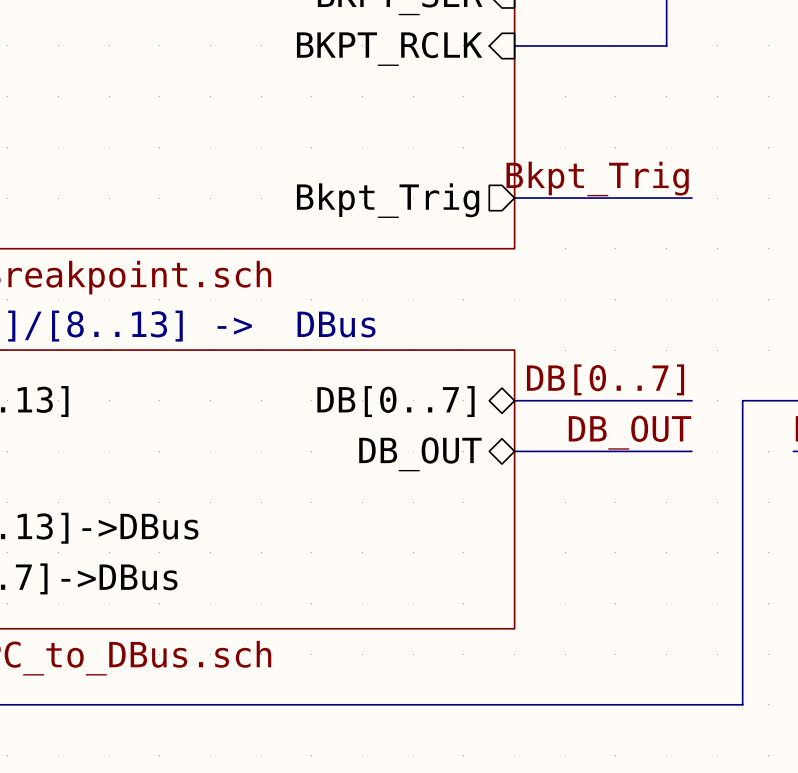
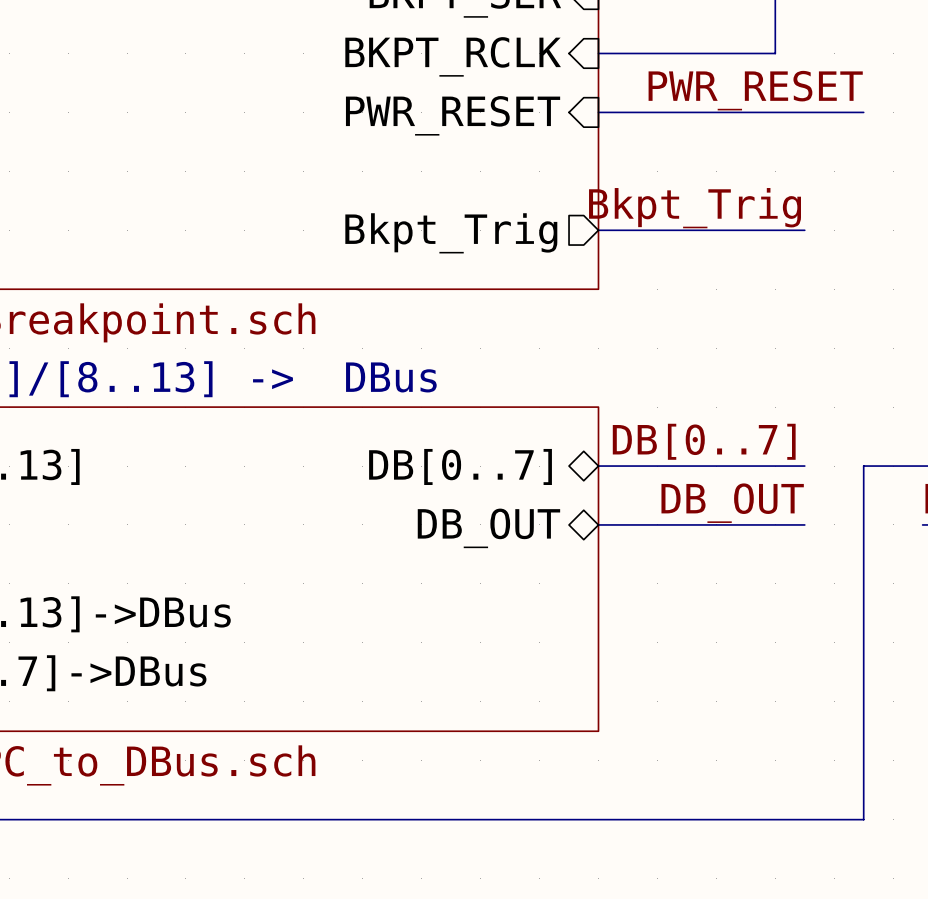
label: none -> PWR_RESET (755, 90)
wire: none -> (598, 112) (863, 112)
sheet pin: none -> PWR_RESET (453, 115)

